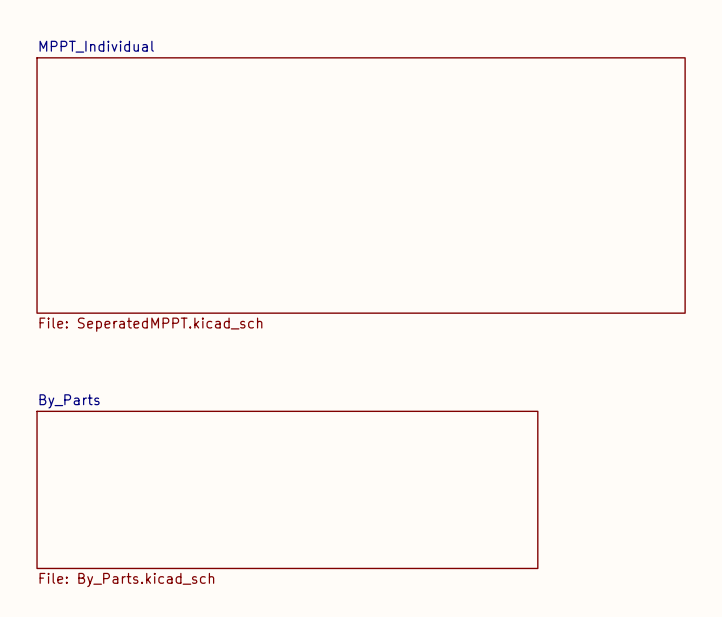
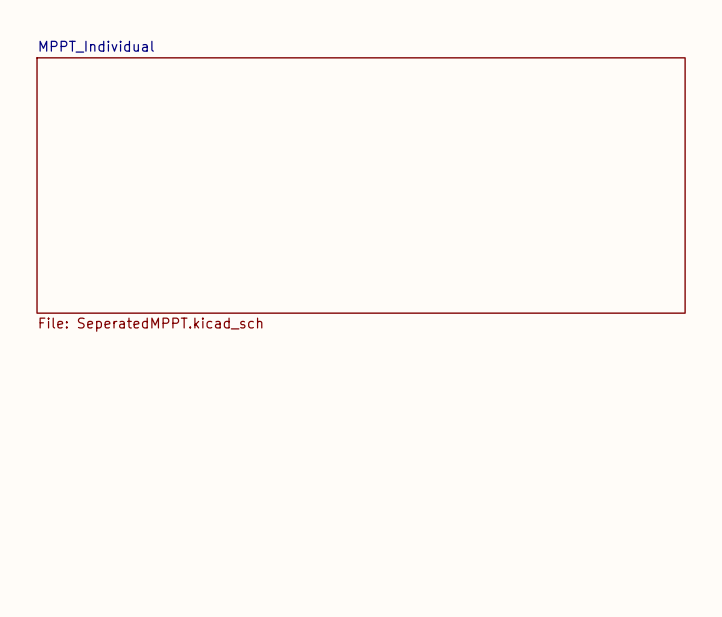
sheet By_Parts: File: By_Parts.kicad_sch (287, 489) -> none

